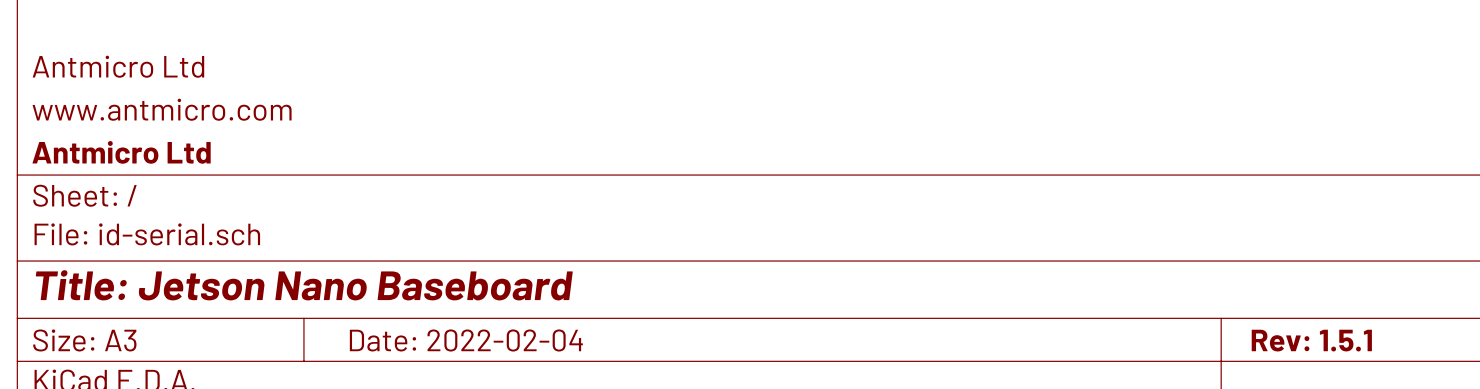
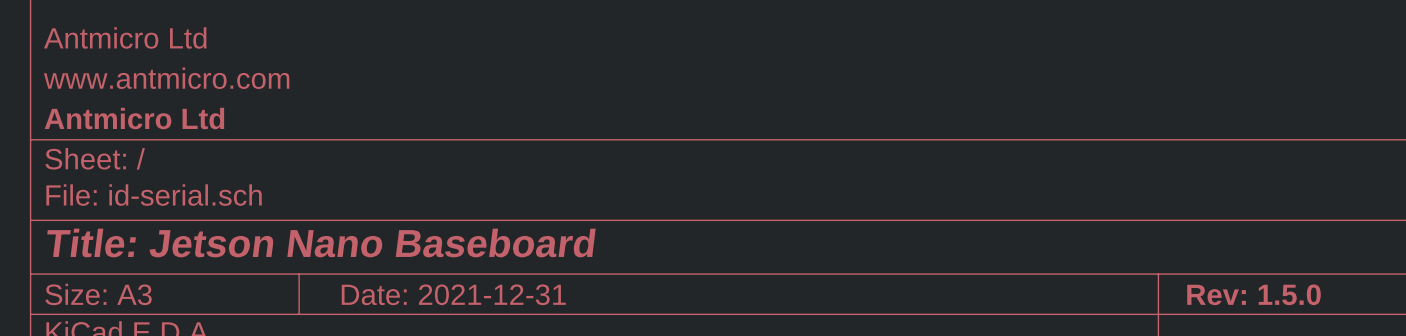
title block: Date: 2022-02-04 (466, 340) -> Date: 2021-12-31 (453, 294)
title block: Rev: 1.5.1 (1311, 340) -> Rev: 1.5.0 (1253, 294)

